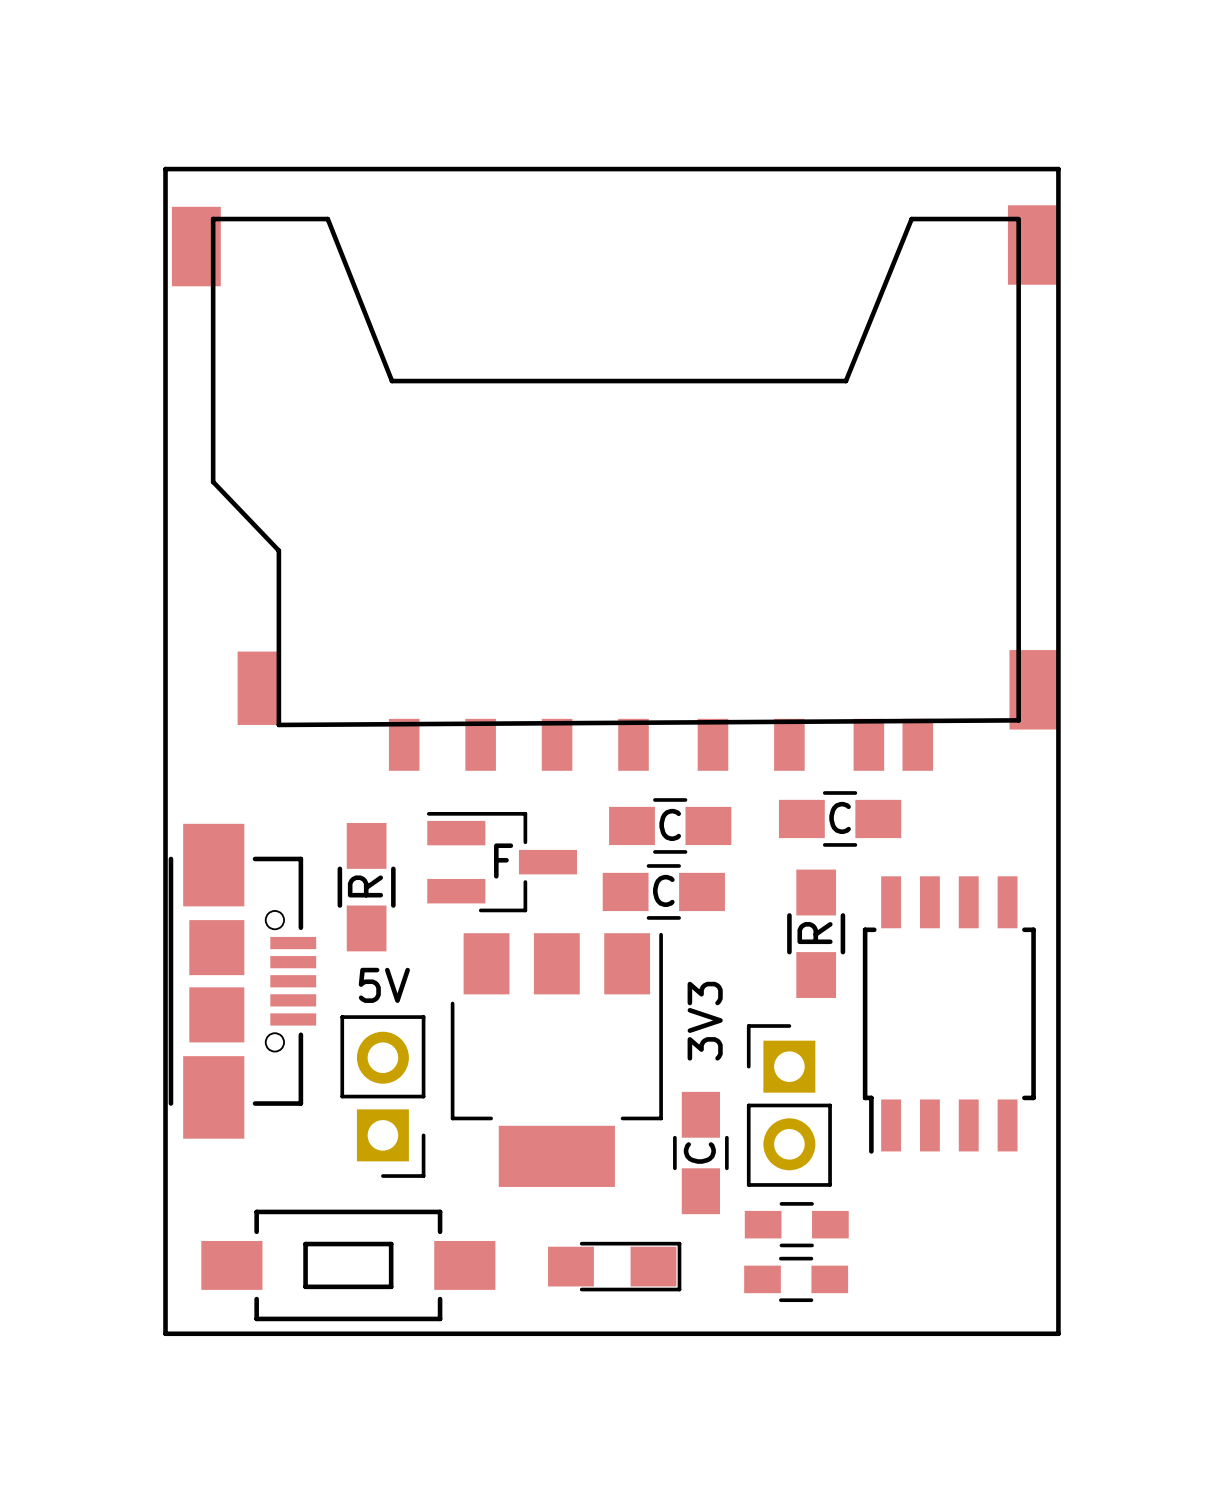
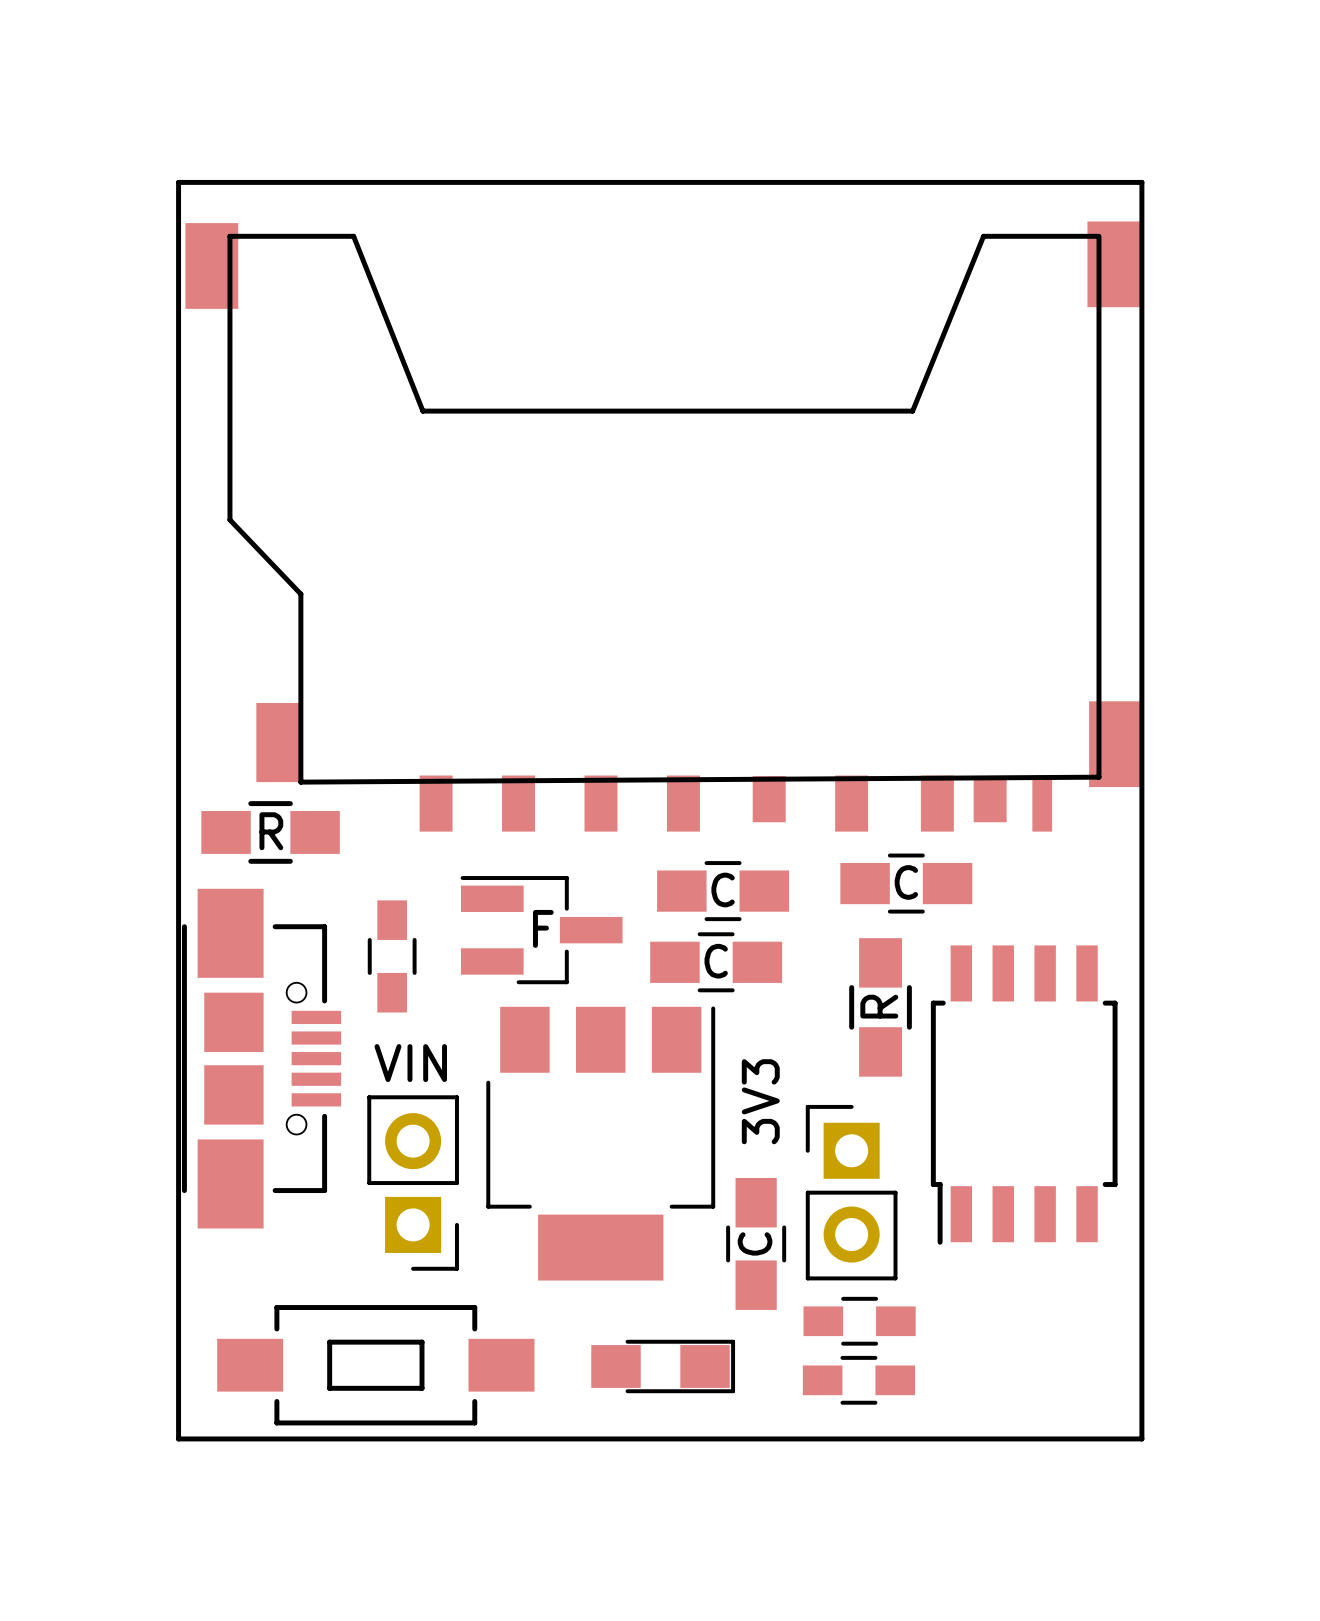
part footprint: [171, 205, 1059, 771] -> [185, 221, 1142, 832]
part: none -> (270, 832)
part footprint: [337, 822, 396, 952] -> [367, 900, 417, 1013]
part value: 5V (384, 985) -> VIN (410, 1063)

